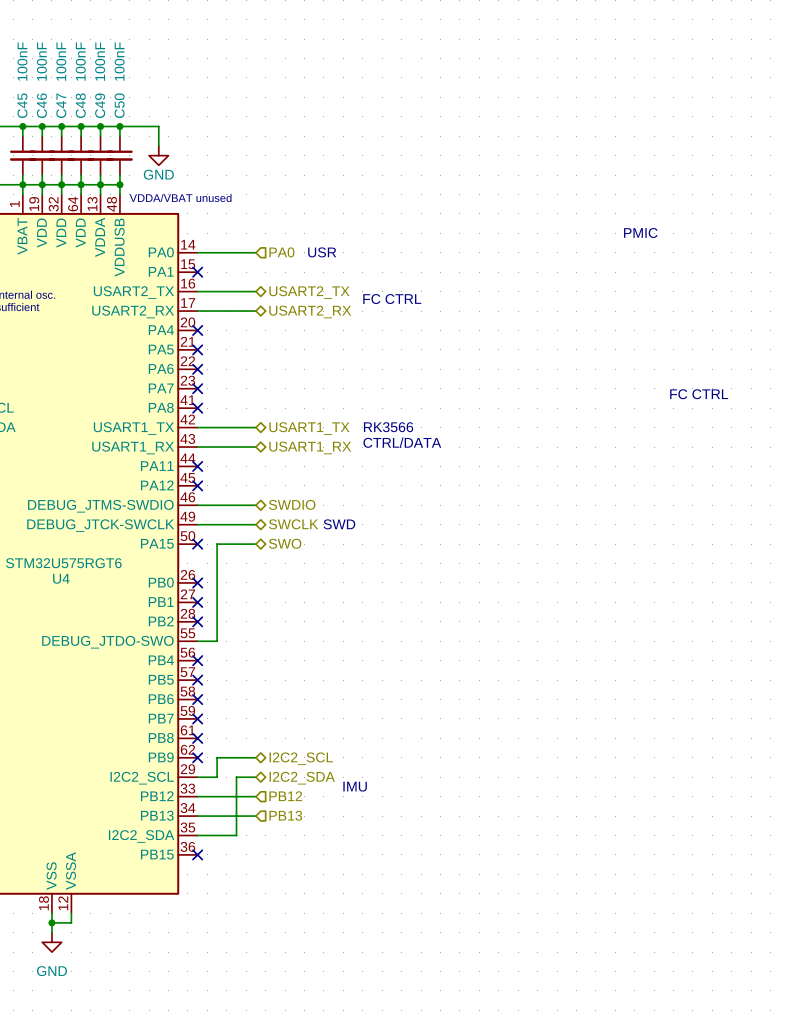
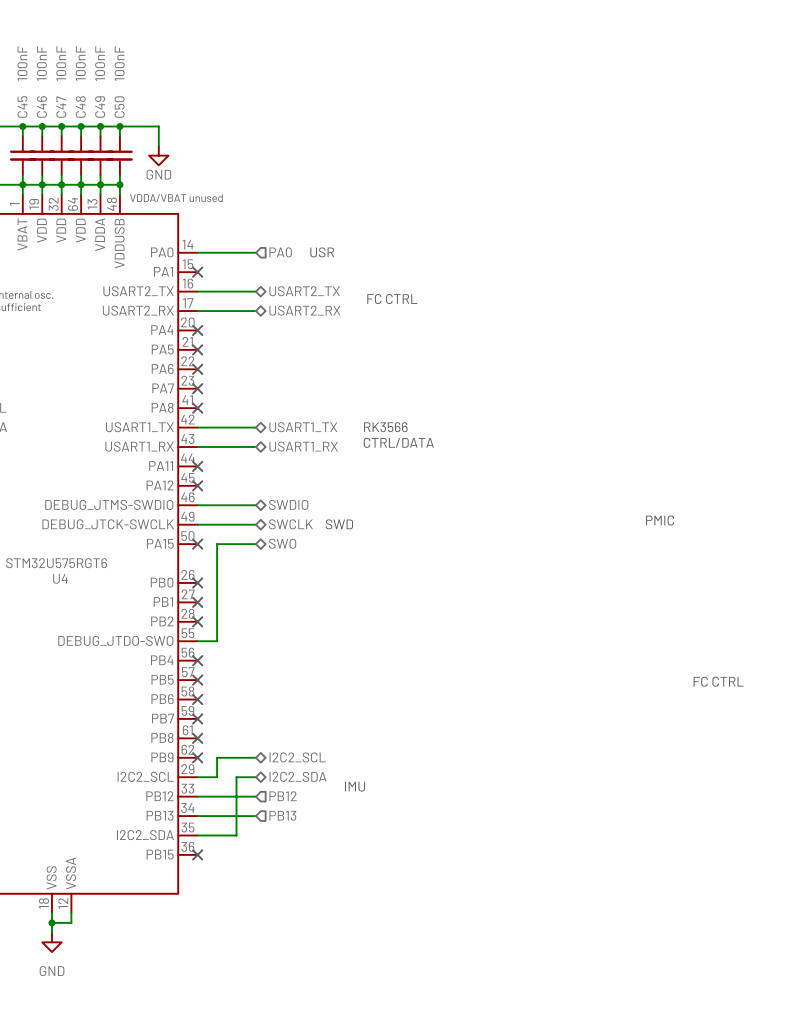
text: PMIC (640, 232) -> none
text: FC CTRL (699, 394) -> none
text: none -> PMIC (660, 520)
text: none -> FC CTRL (718, 681)

